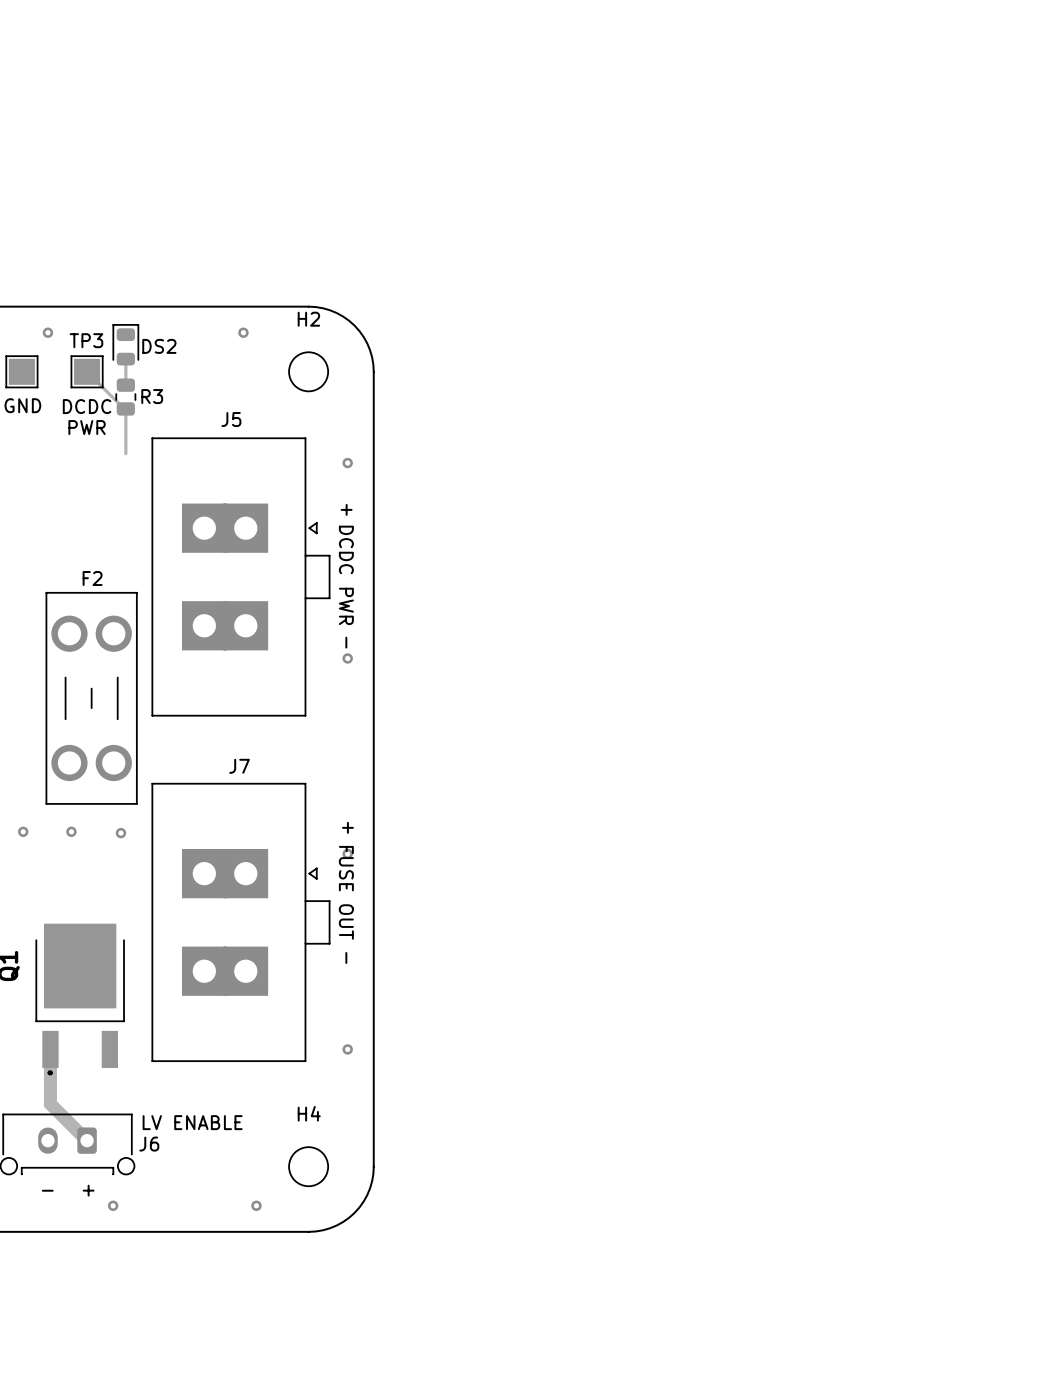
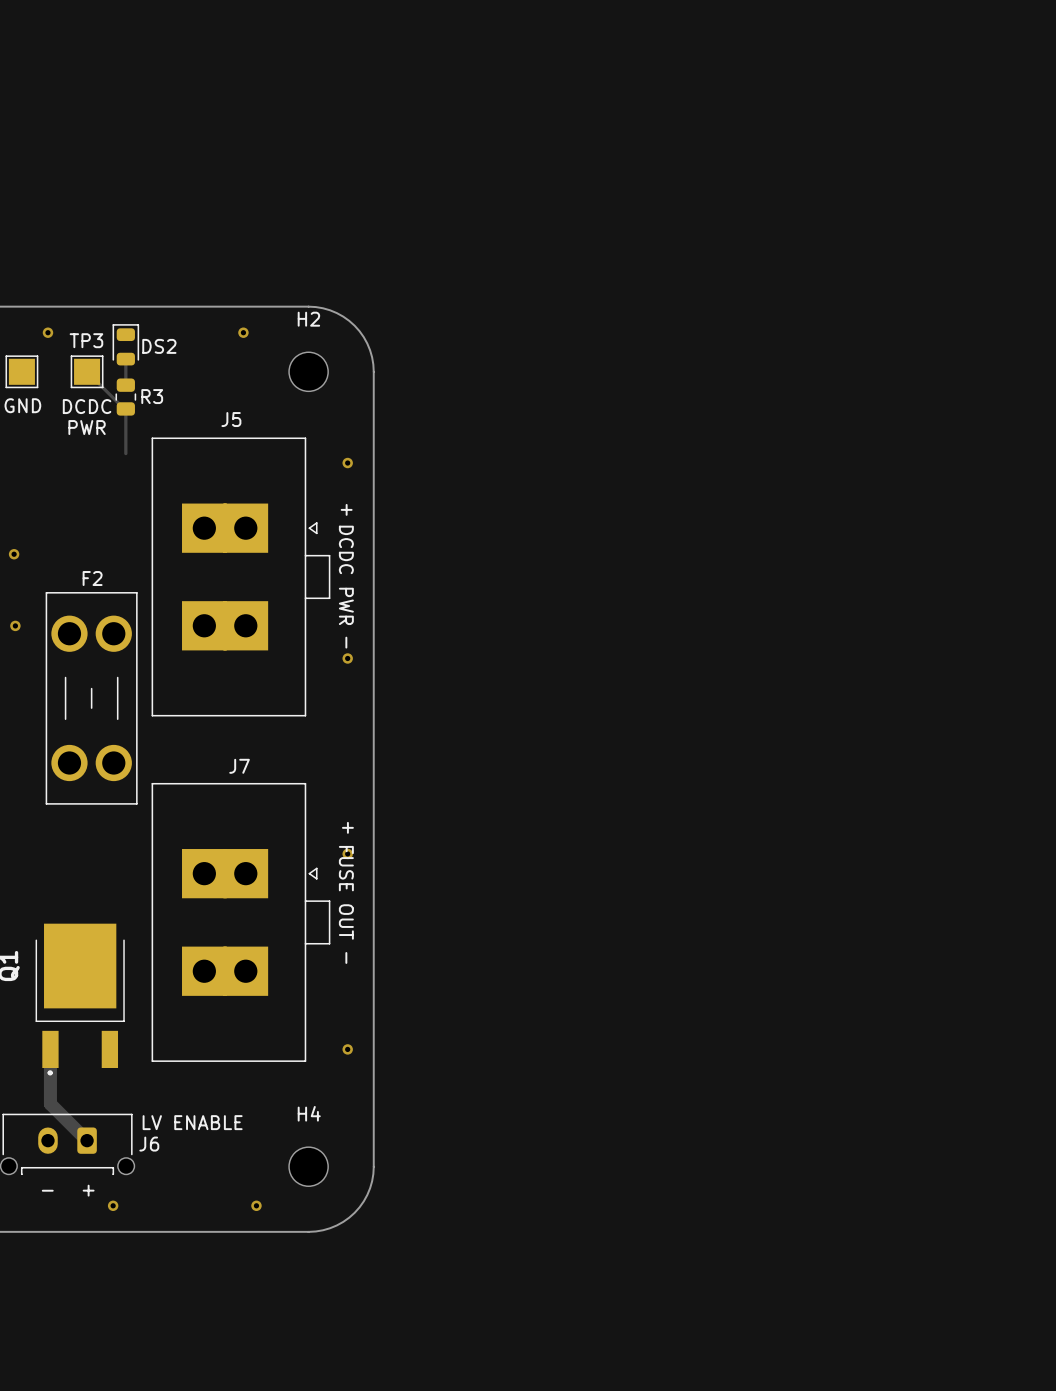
via: none -> (14, 554)
via: none -> (15, 625)
via: (23, 831) -> none
via: (71, 831) -> none
via: (120, 833) -> none

